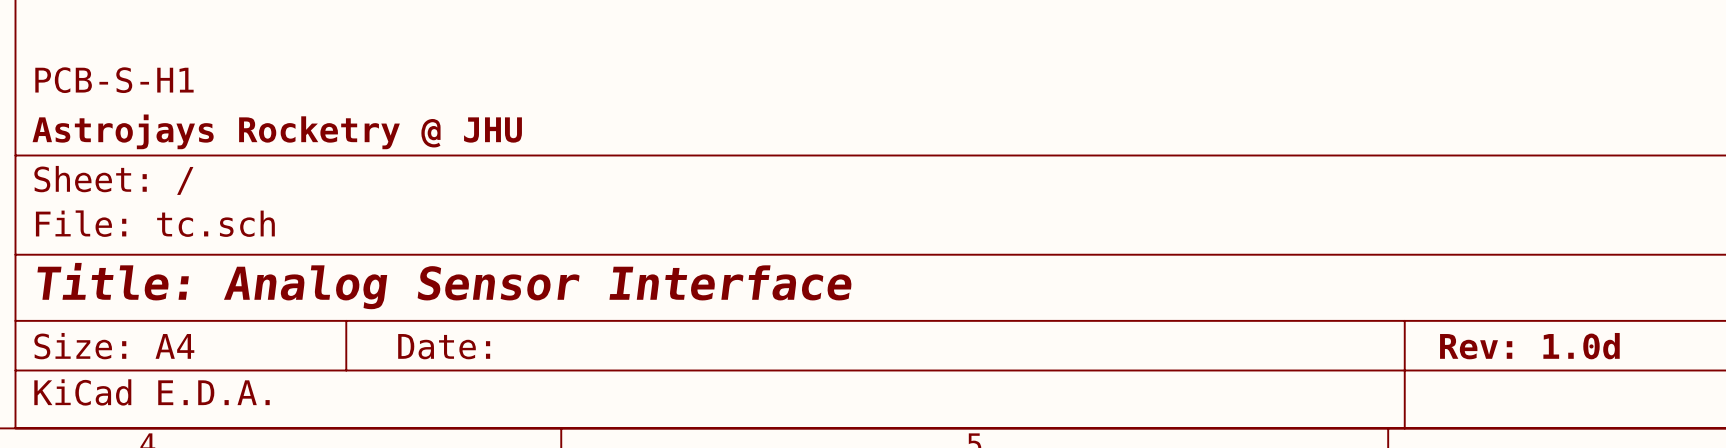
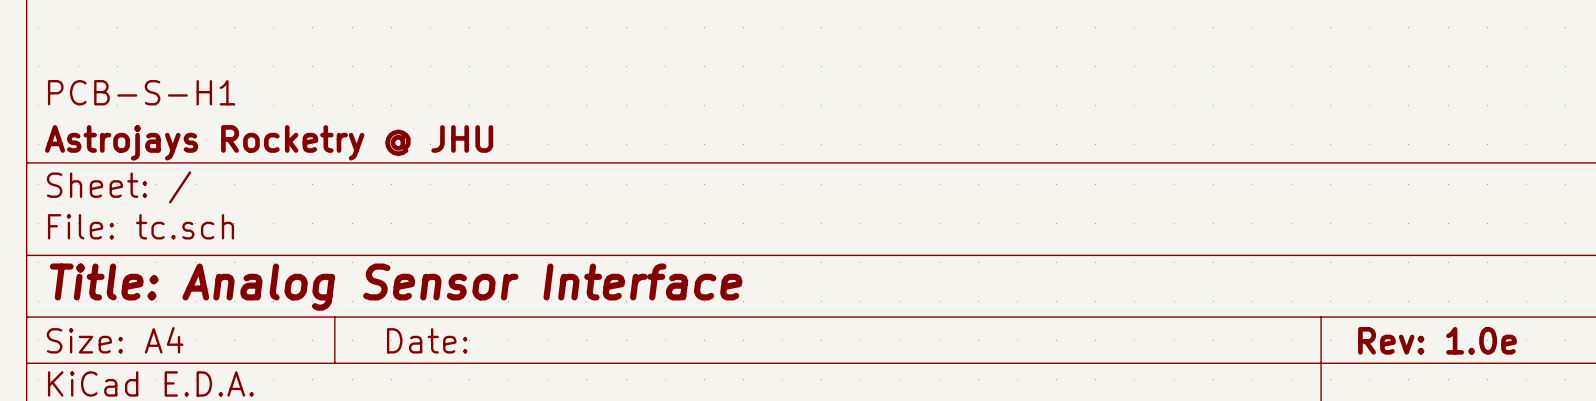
title block: Rev: 1.0d (1529, 346) -> Rev: 1.0e (1437, 340)

